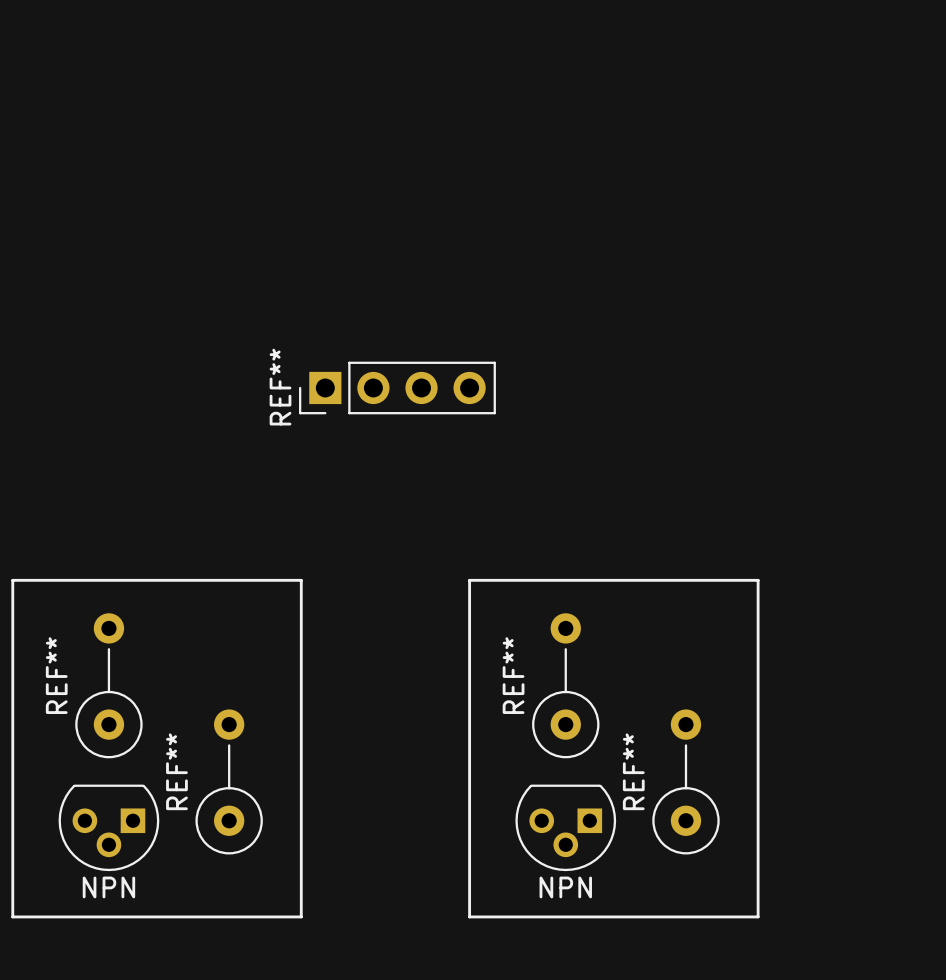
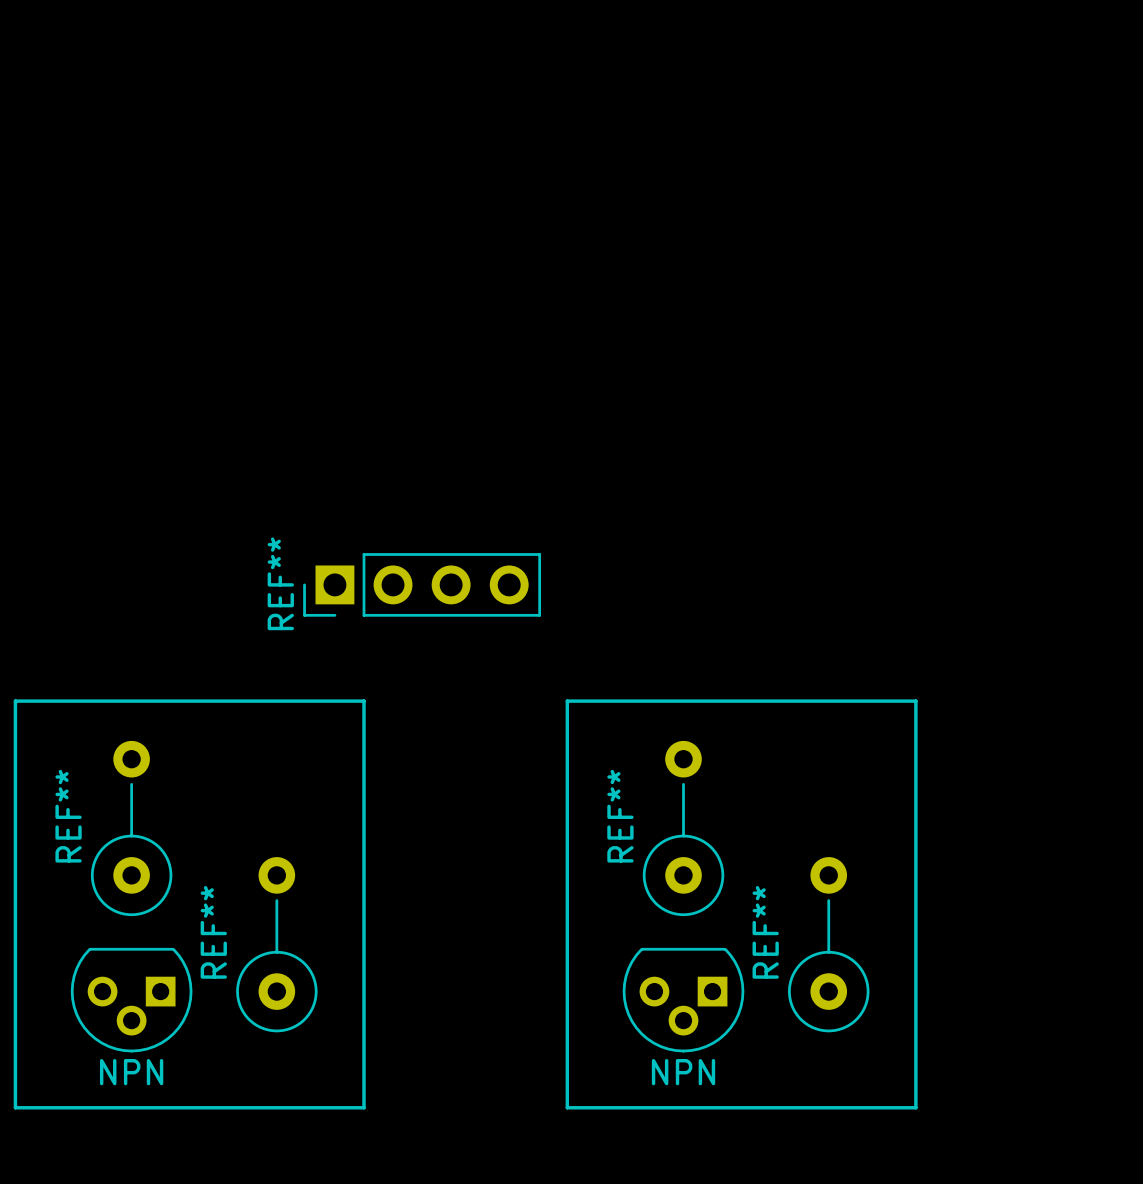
REF** position: (397, 387) -> (422, 584)

